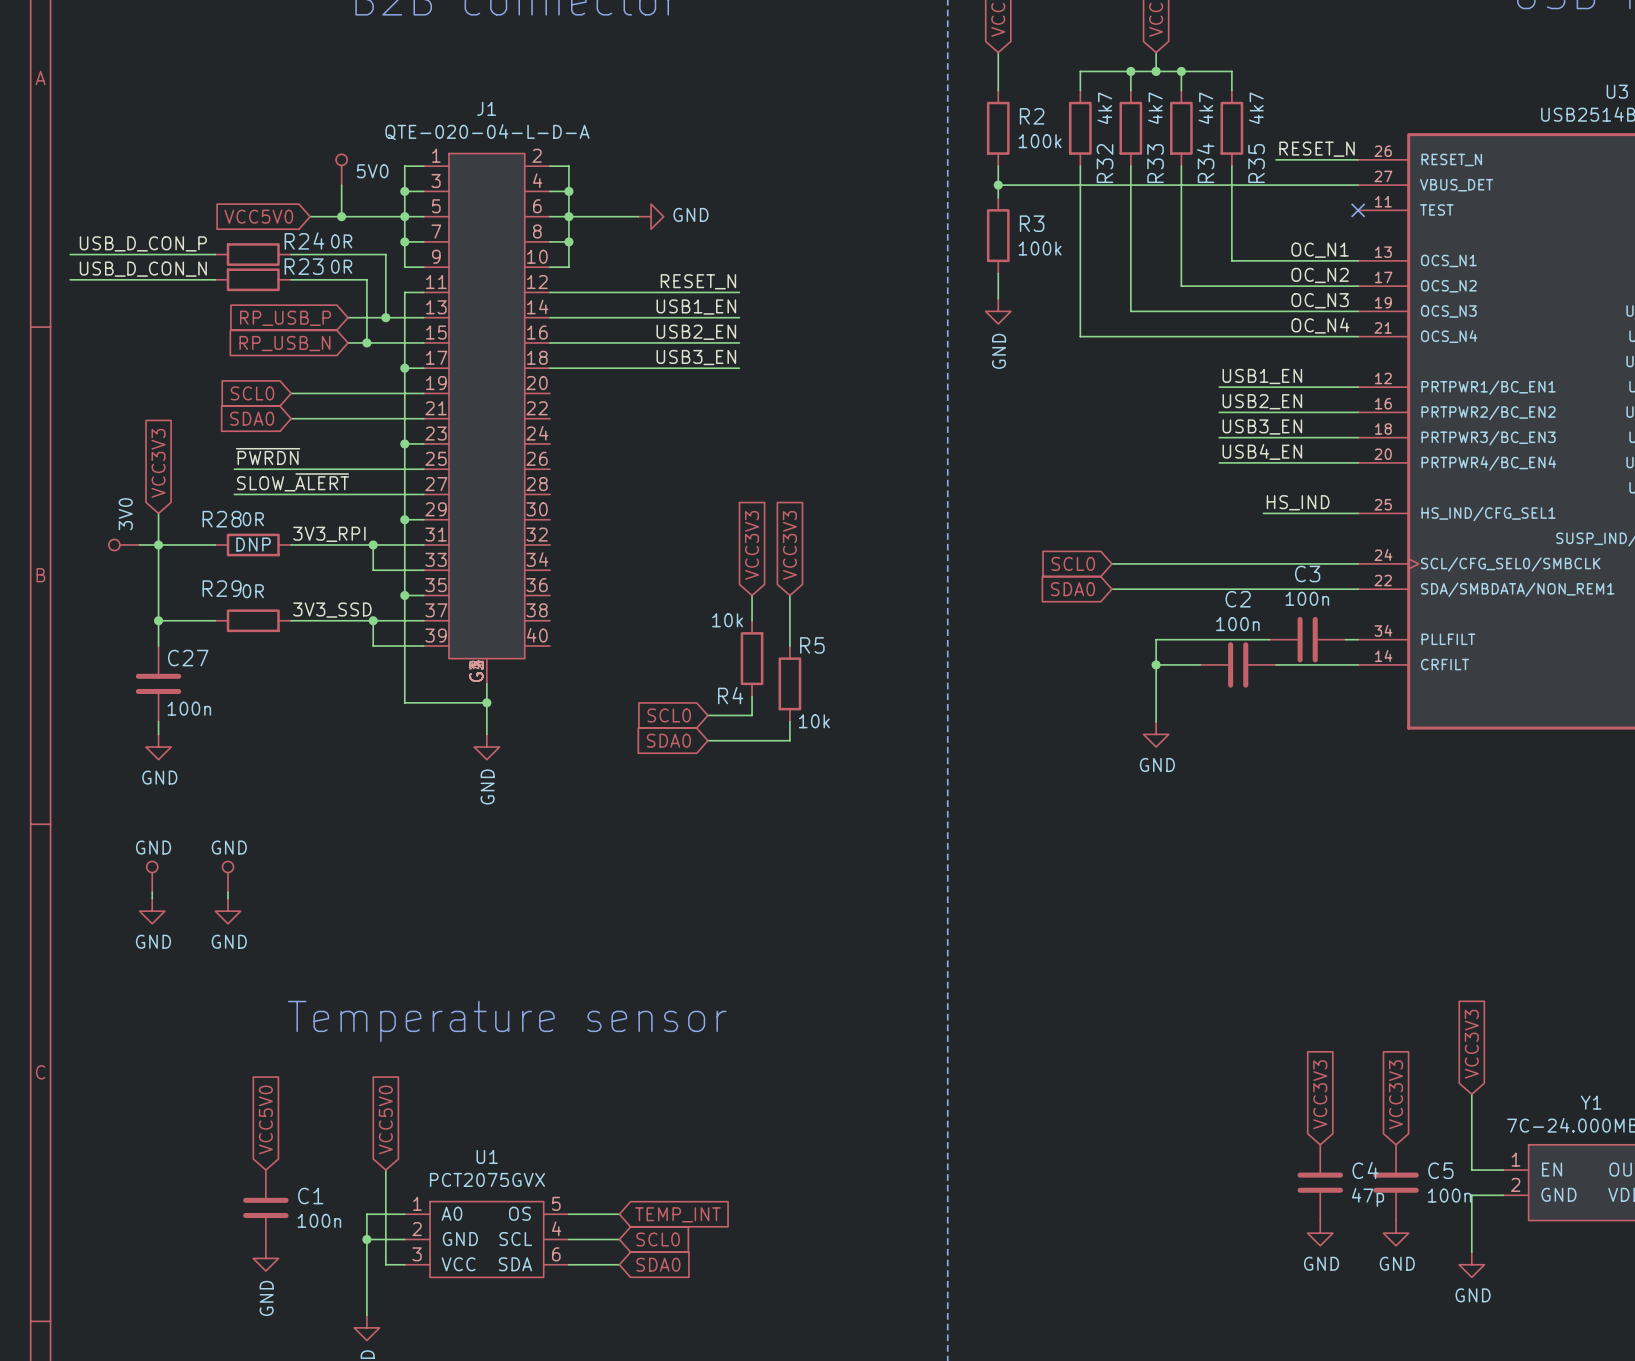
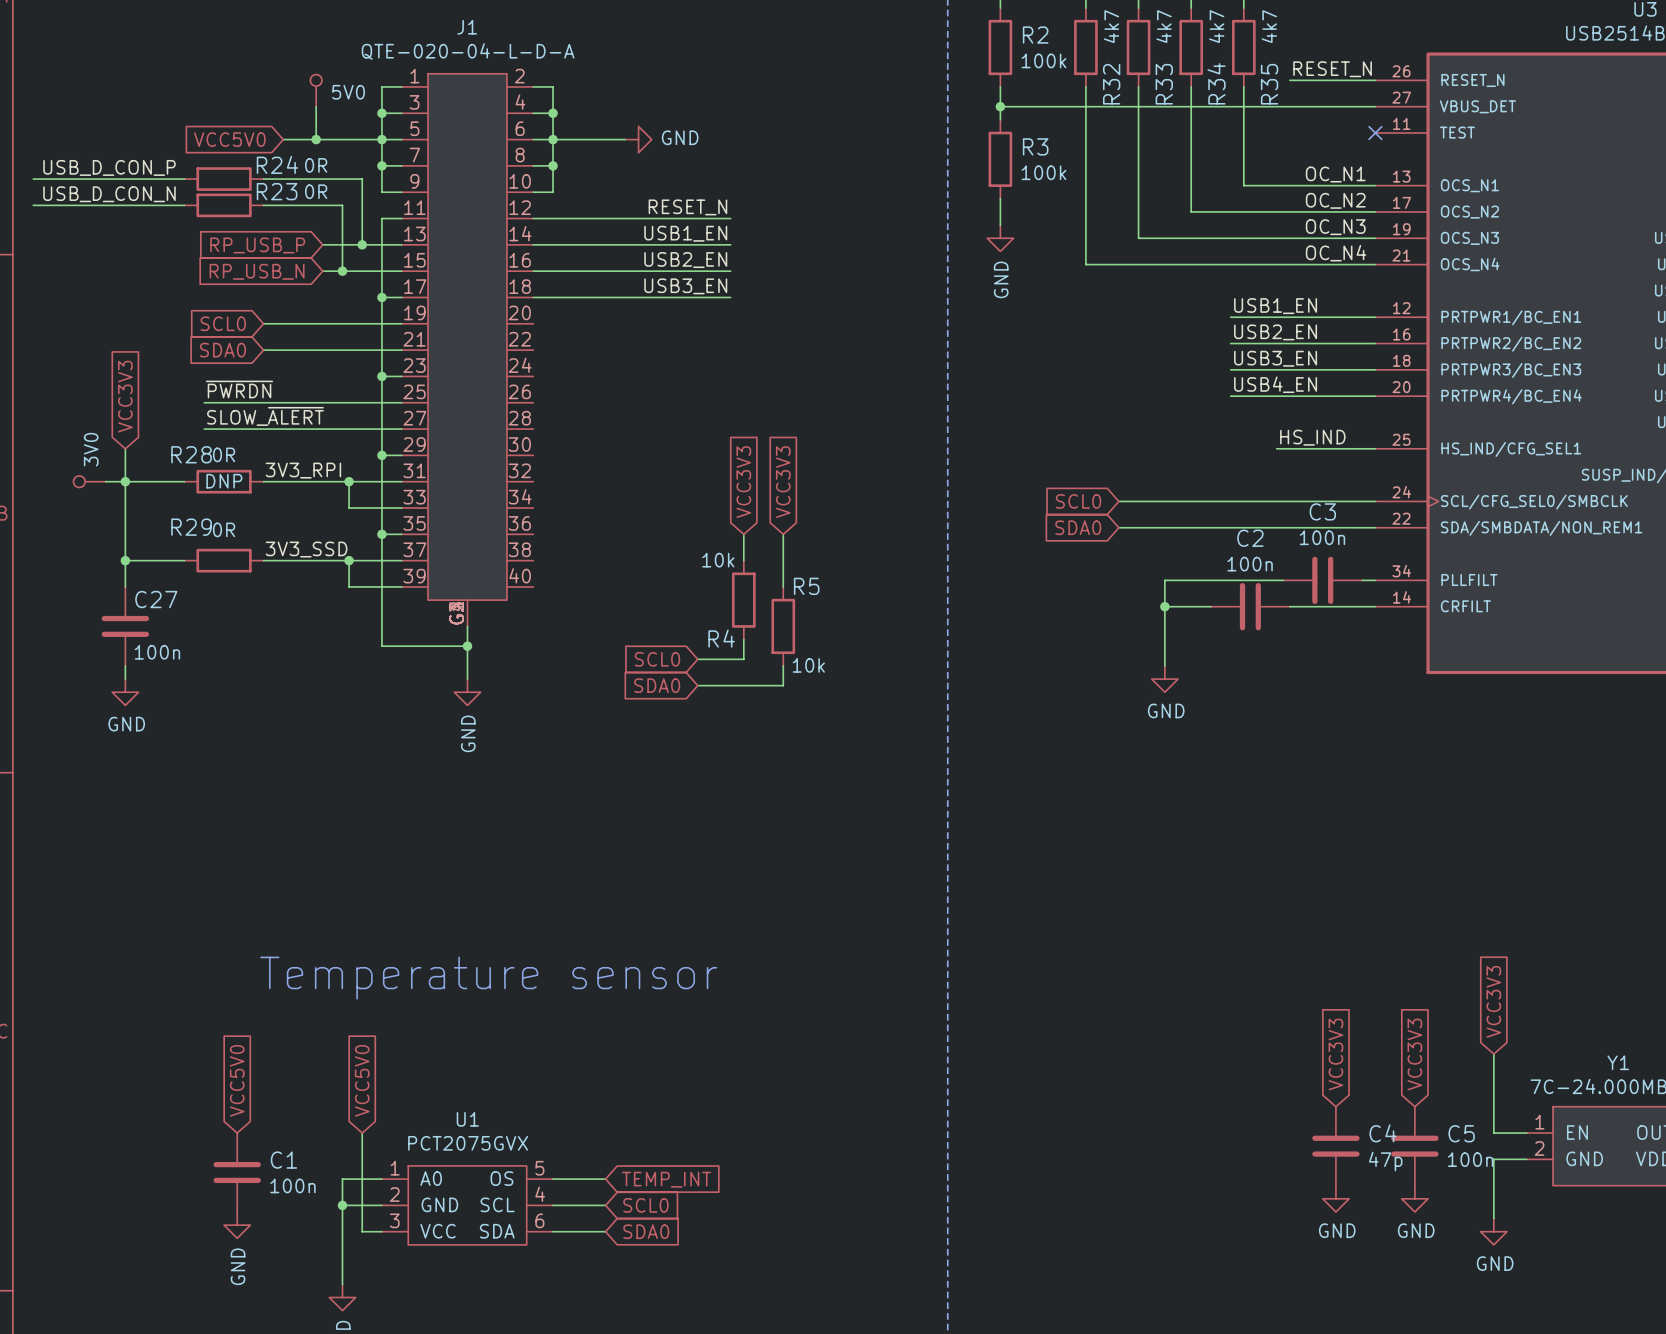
GND: (152, 876) -> none
GND: (228, 876) -> none
wire: (152, 892) (152, 898) -> none
wire: (228, 892) (228, 898) -> none
power symbol: GND (152, 911) -> none
power symbol: GND (228, 911) -> none

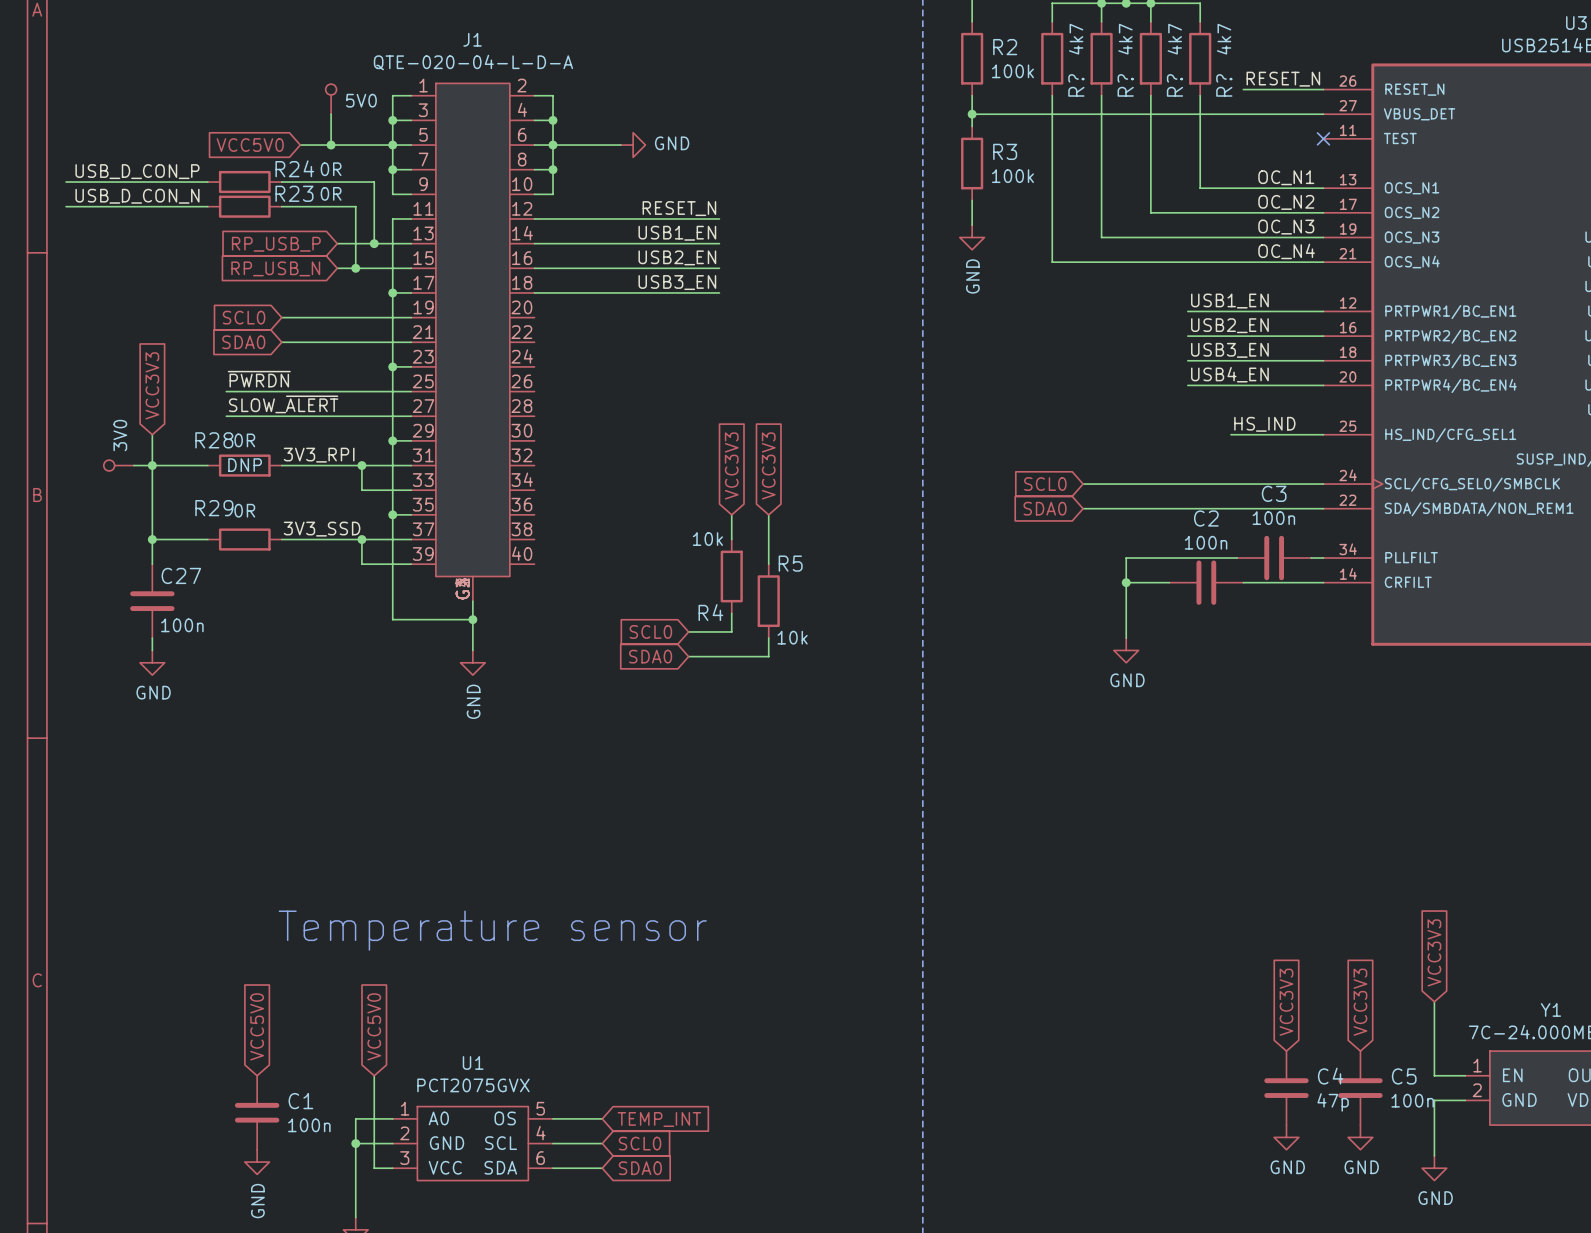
R34 name: R34 (1216, 83) -> R? (1174, 85)
R32 name: R32 (1111, 84) -> R? (1076, 85)
R33 name: R33 (1164, 84) -> R? (1125, 85)
R35 name: R35 (1269, 84) -> R? (1224, 85)

